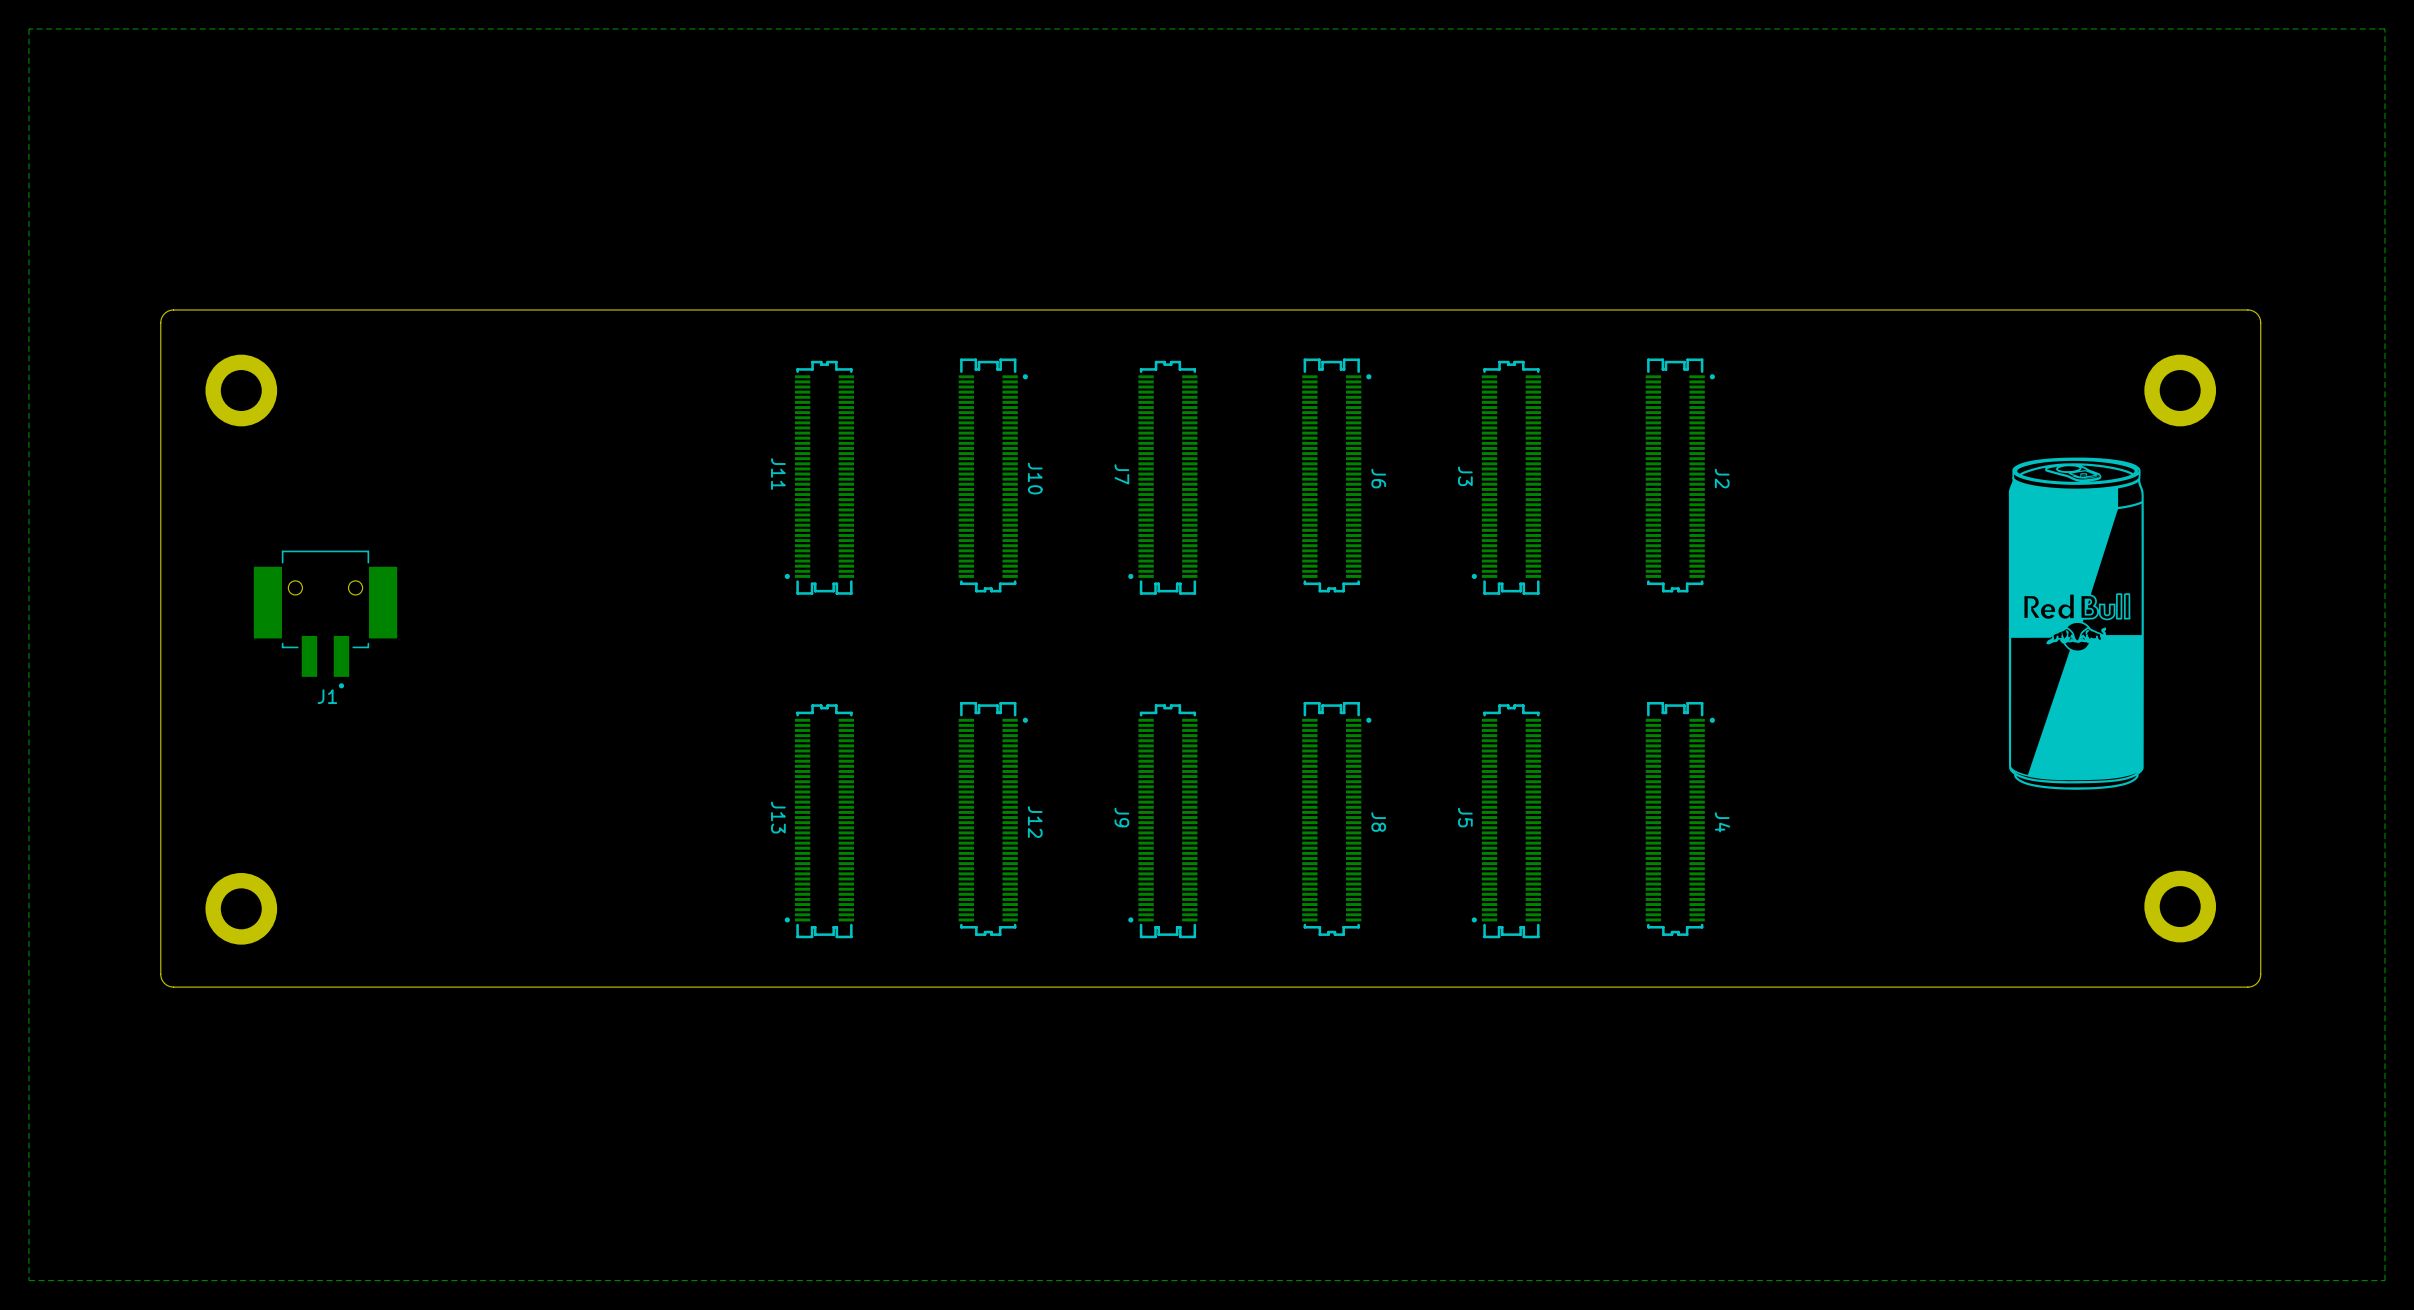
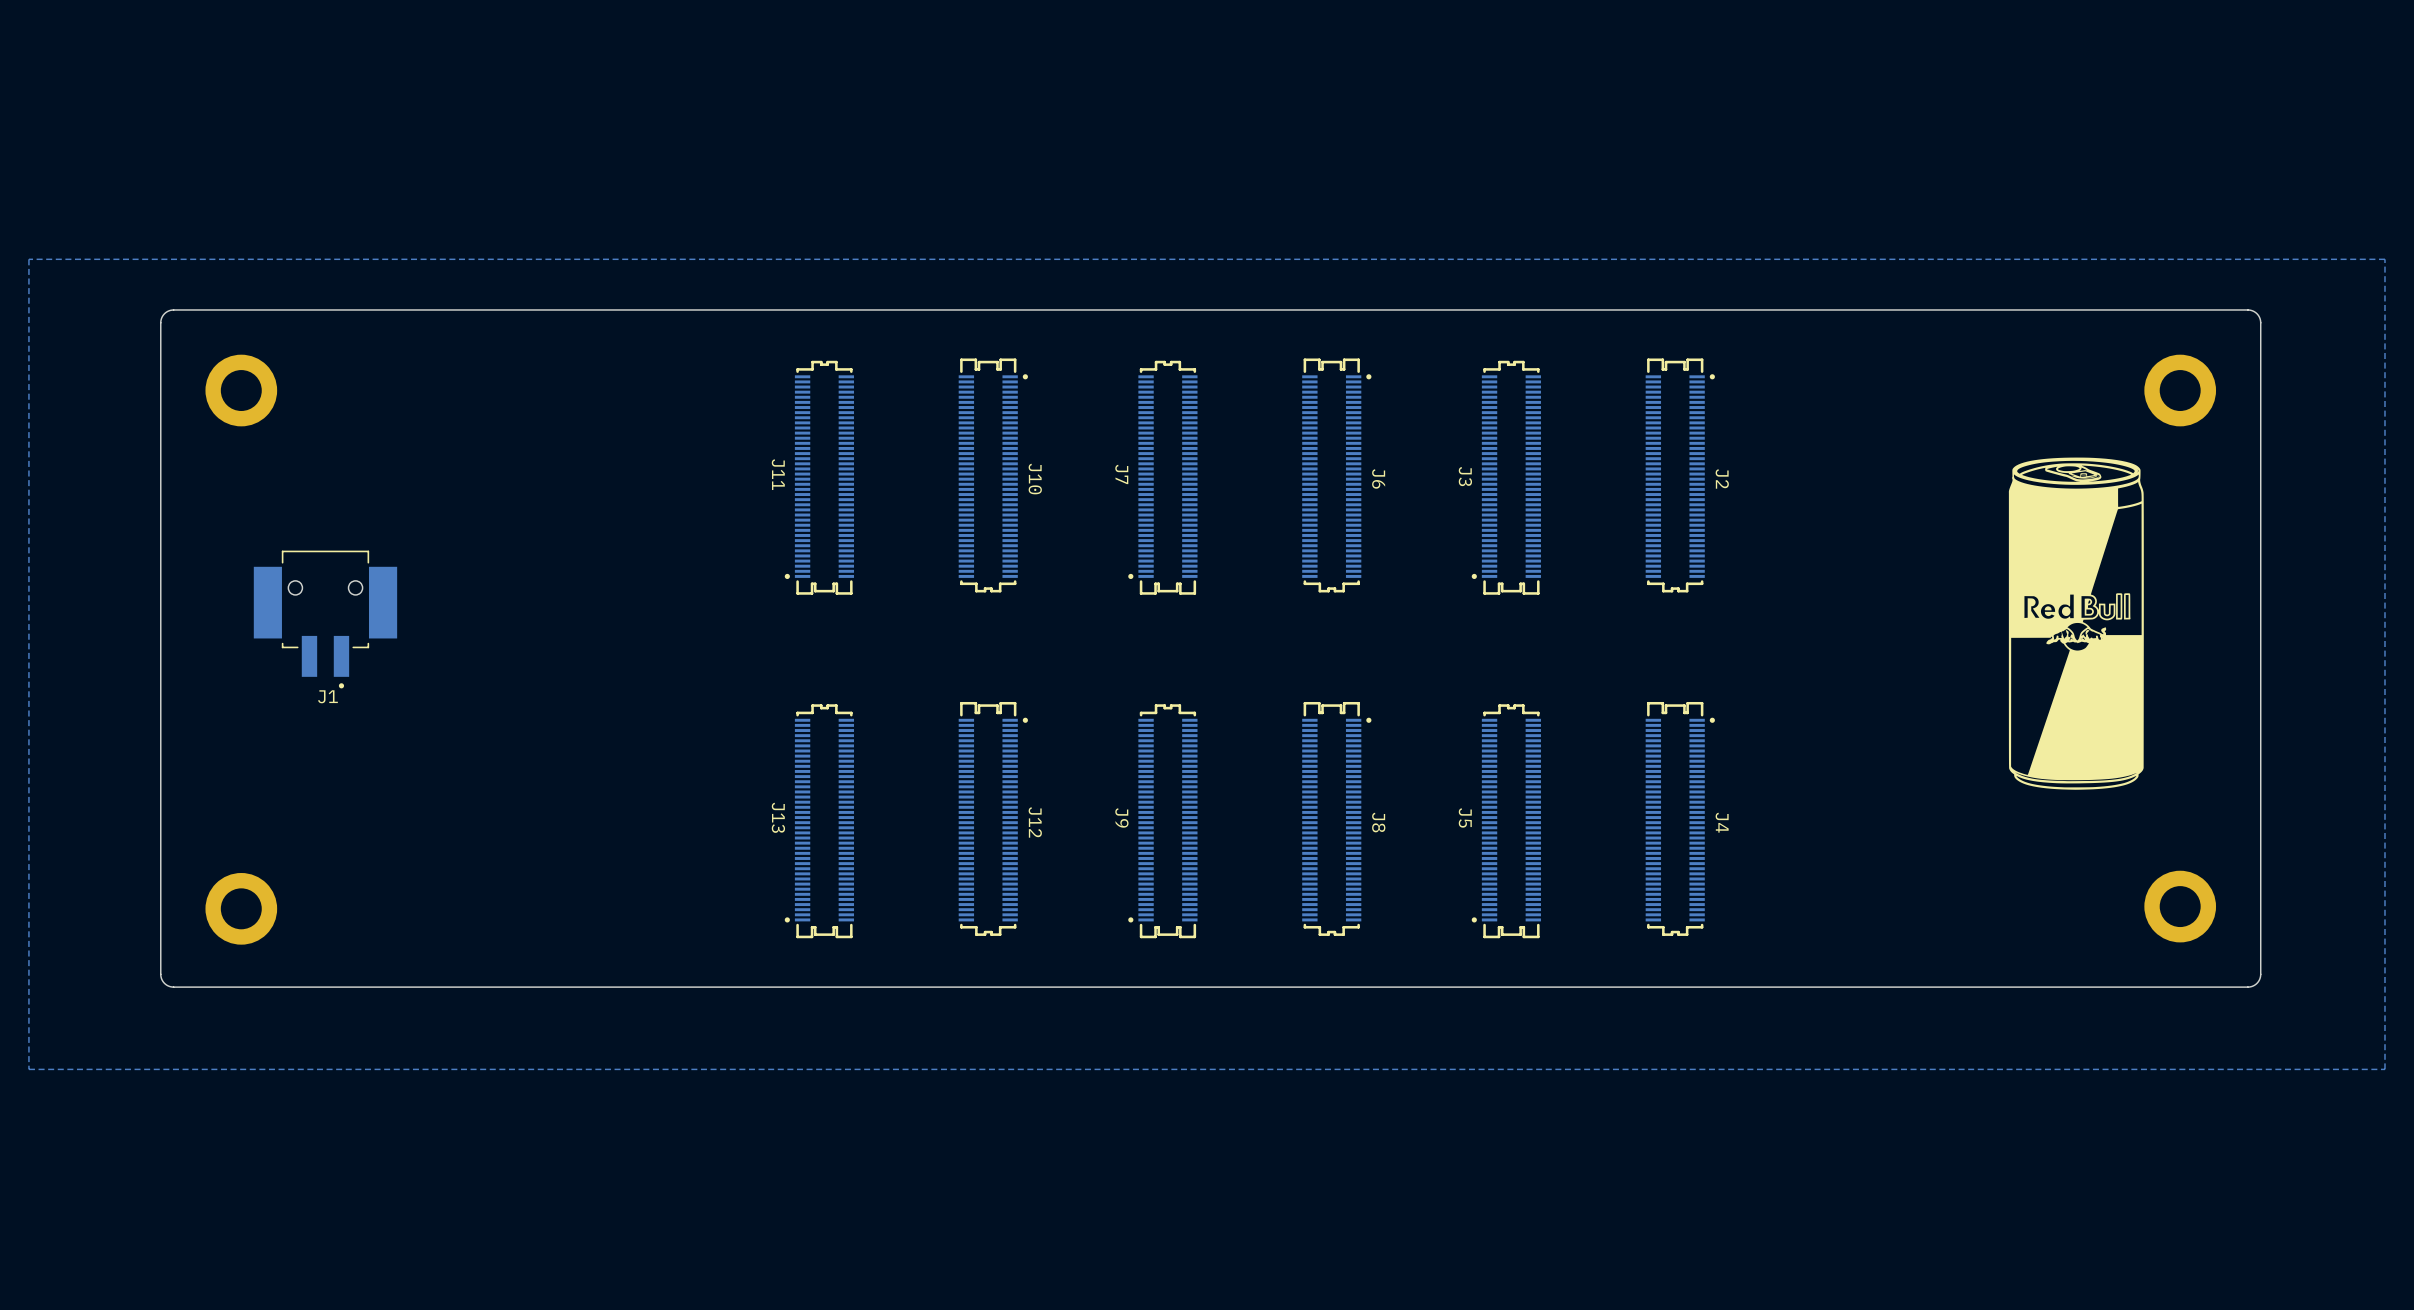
zone outline: (2384, 259) (2384, 28) (28, 28) (28, 259) -> (2384, 259) (28, 259)
zone outline: (2384, 1069) (2384, 1280) (28, 1280) (28, 1069) -> (2384, 1069) (28, 1069)

